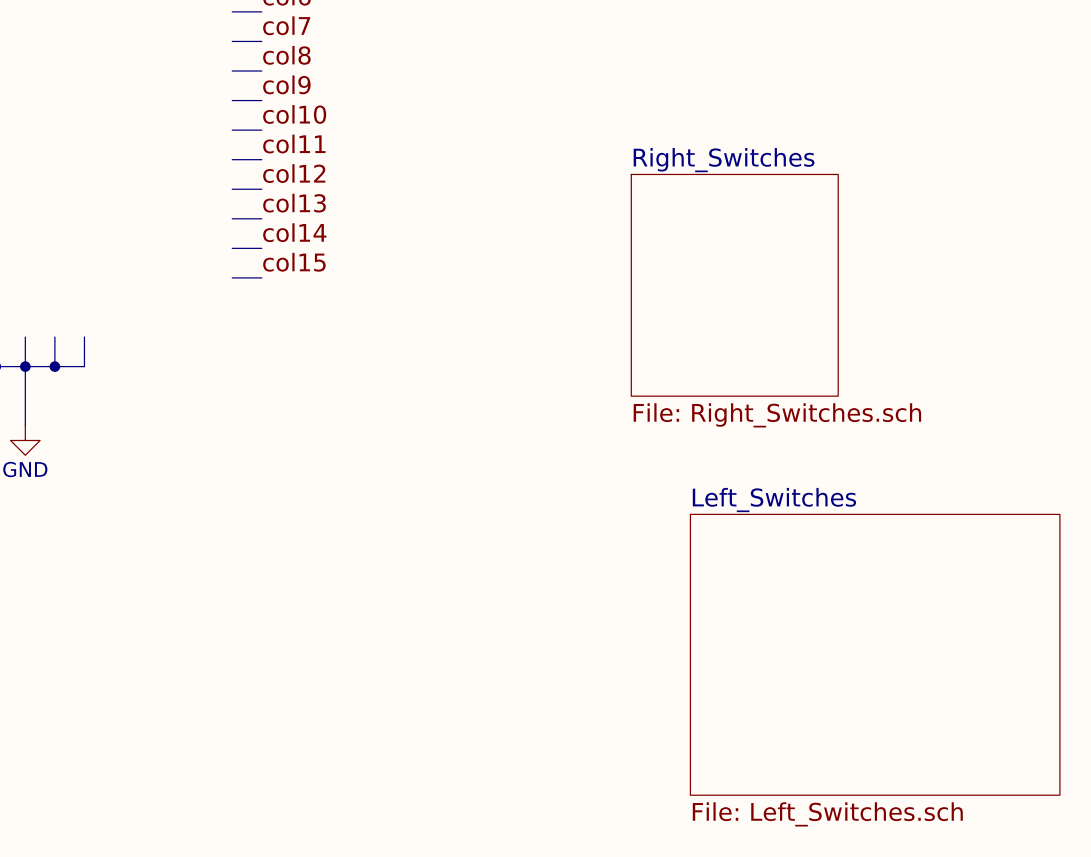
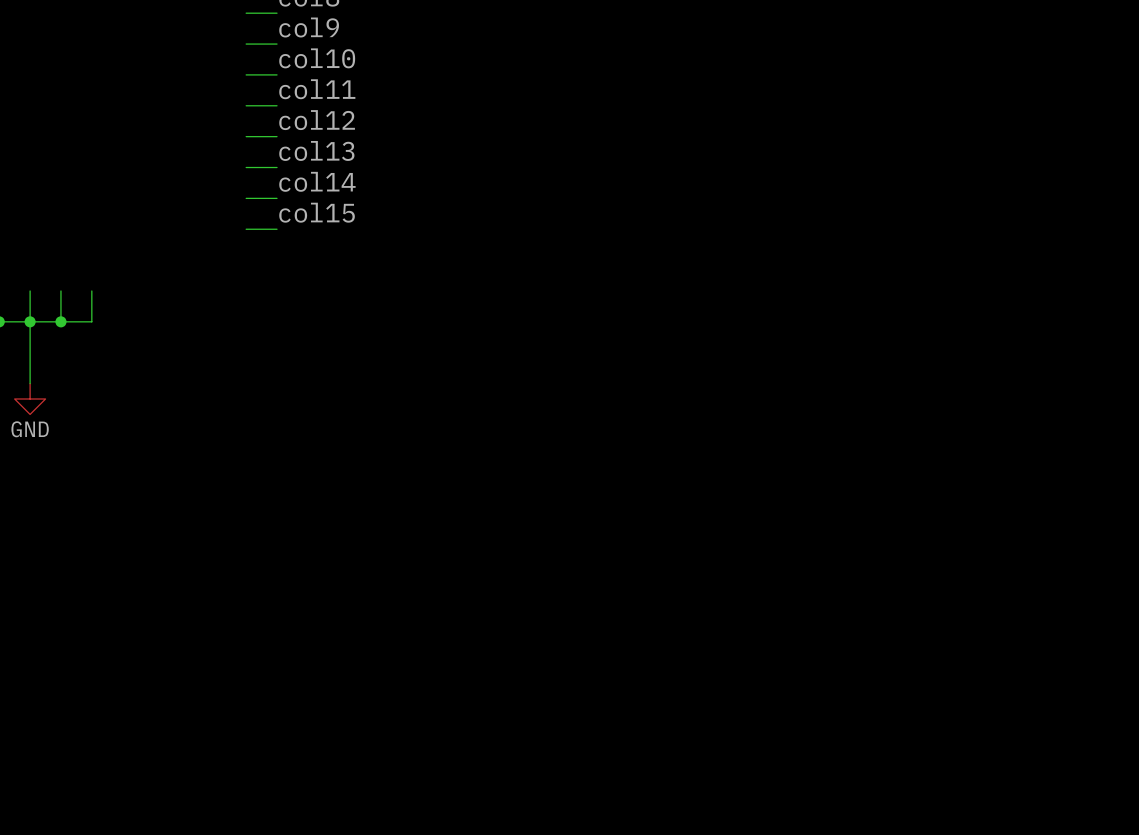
sheet Right_Switches: File: Right_Switches.sch (734, 285) -> none
sheet Left_Switches: File: Left_Switches.sch (875, 654) -> none

